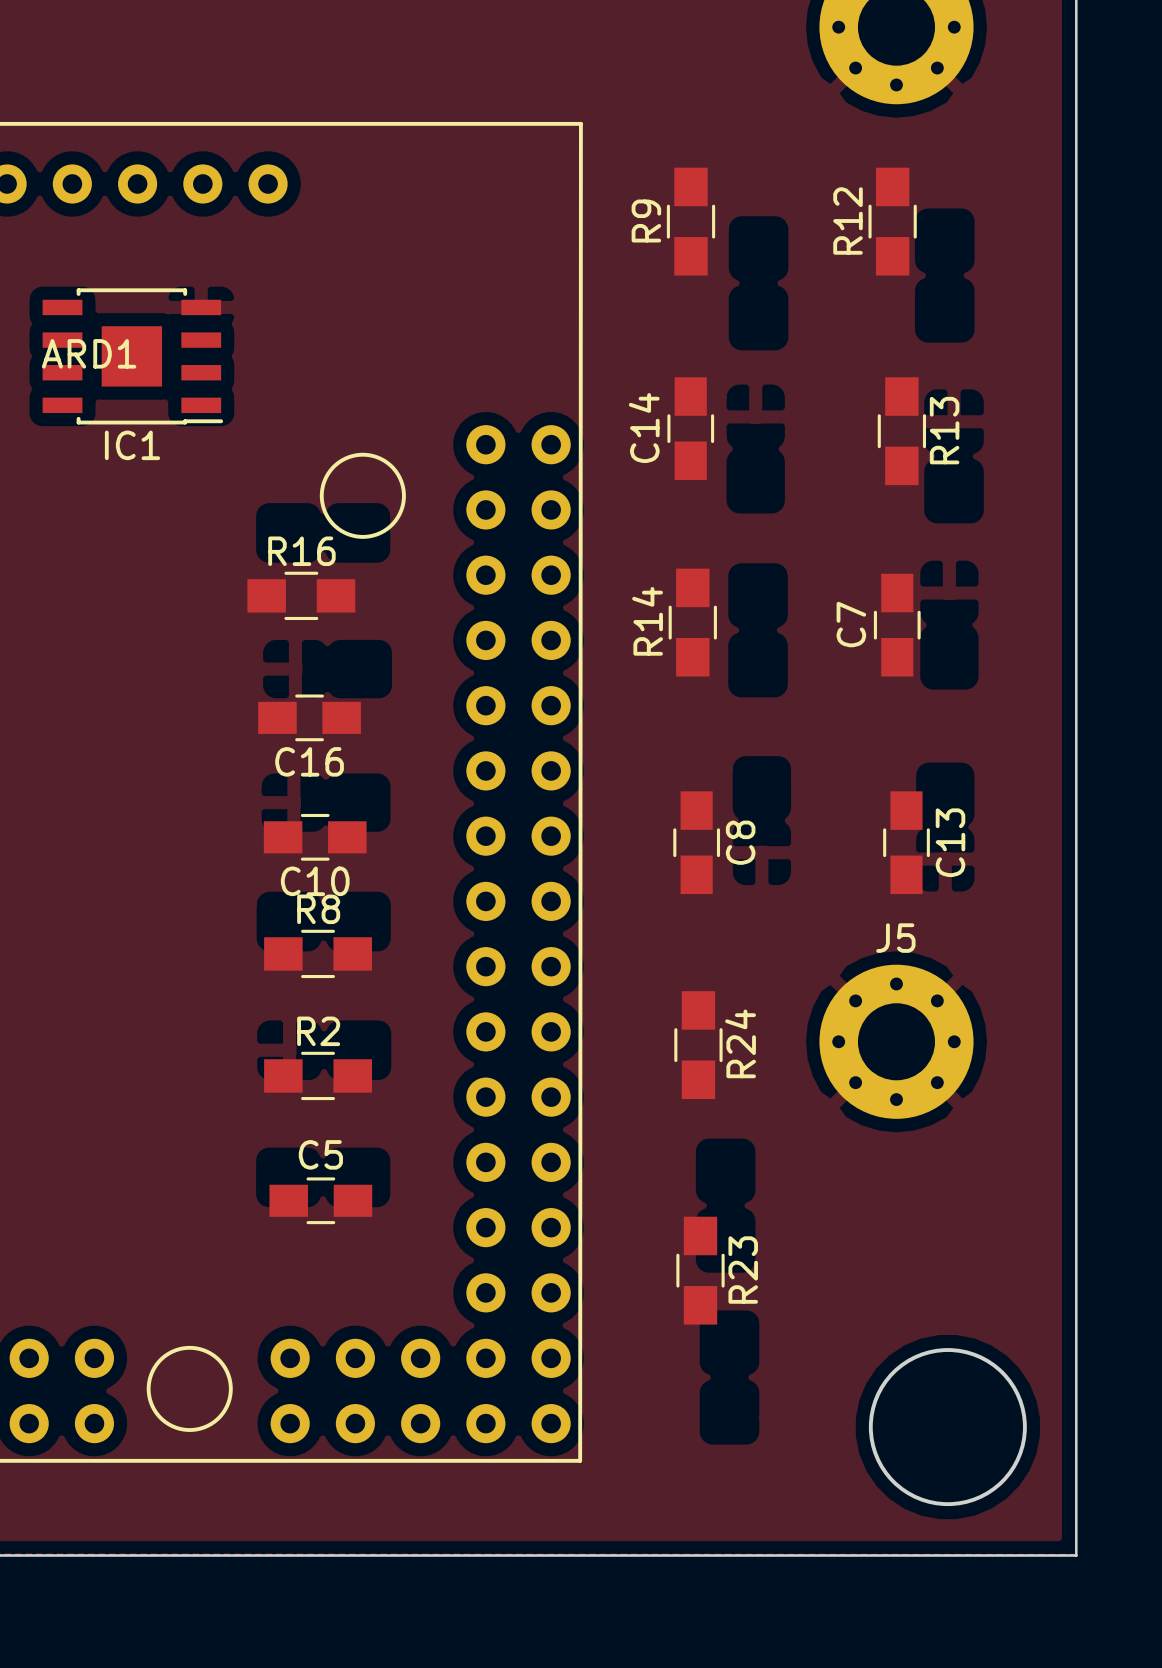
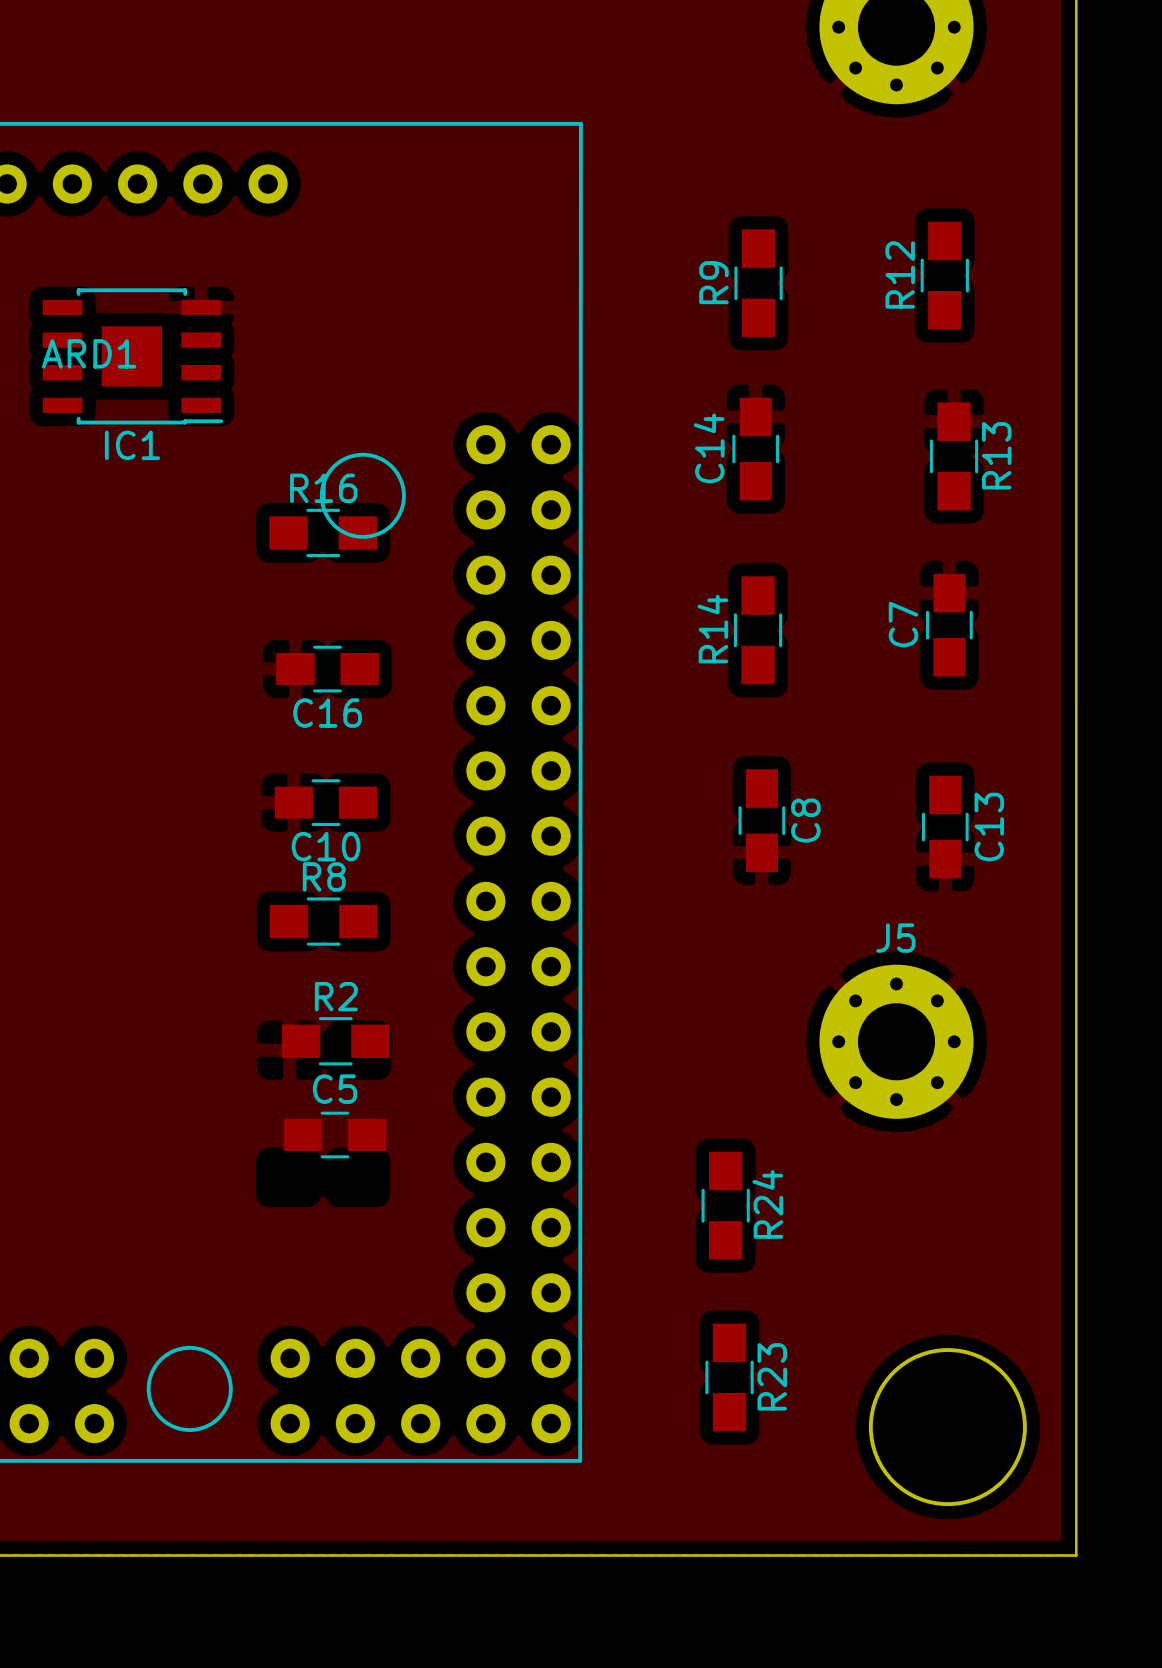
R9 position: (691, 221) -> (758, 283)
R12 position: (892, 221) -> (944, 275)
C14 position: (690, 428) -> (755, 449)
R13 position: (901, 431) -> (954, 456)
R16 position: (301, 595) -> (323, 532)
R14 position: (692, 622) -> (758, 630)
C7 position: (897, 625) -> (949, 625)
C16 position: (309, 717) -> (327, 669)
C10 position: (315, 837) -> (326, 802)
C8 position: (696, 842) -> (761, 820)
C13 position: (906, 842) -> (945, 827)
R8 position: (318, 953) -> (323, 921)
R24 position: (698, 1045) -> (725, 1205)
R2 position: (318, 1075) -> (335, 1041)
C5 position: (320, 1200) -> (334, 1135)
R23 position: (700, 1270) -> (729, 1377)

